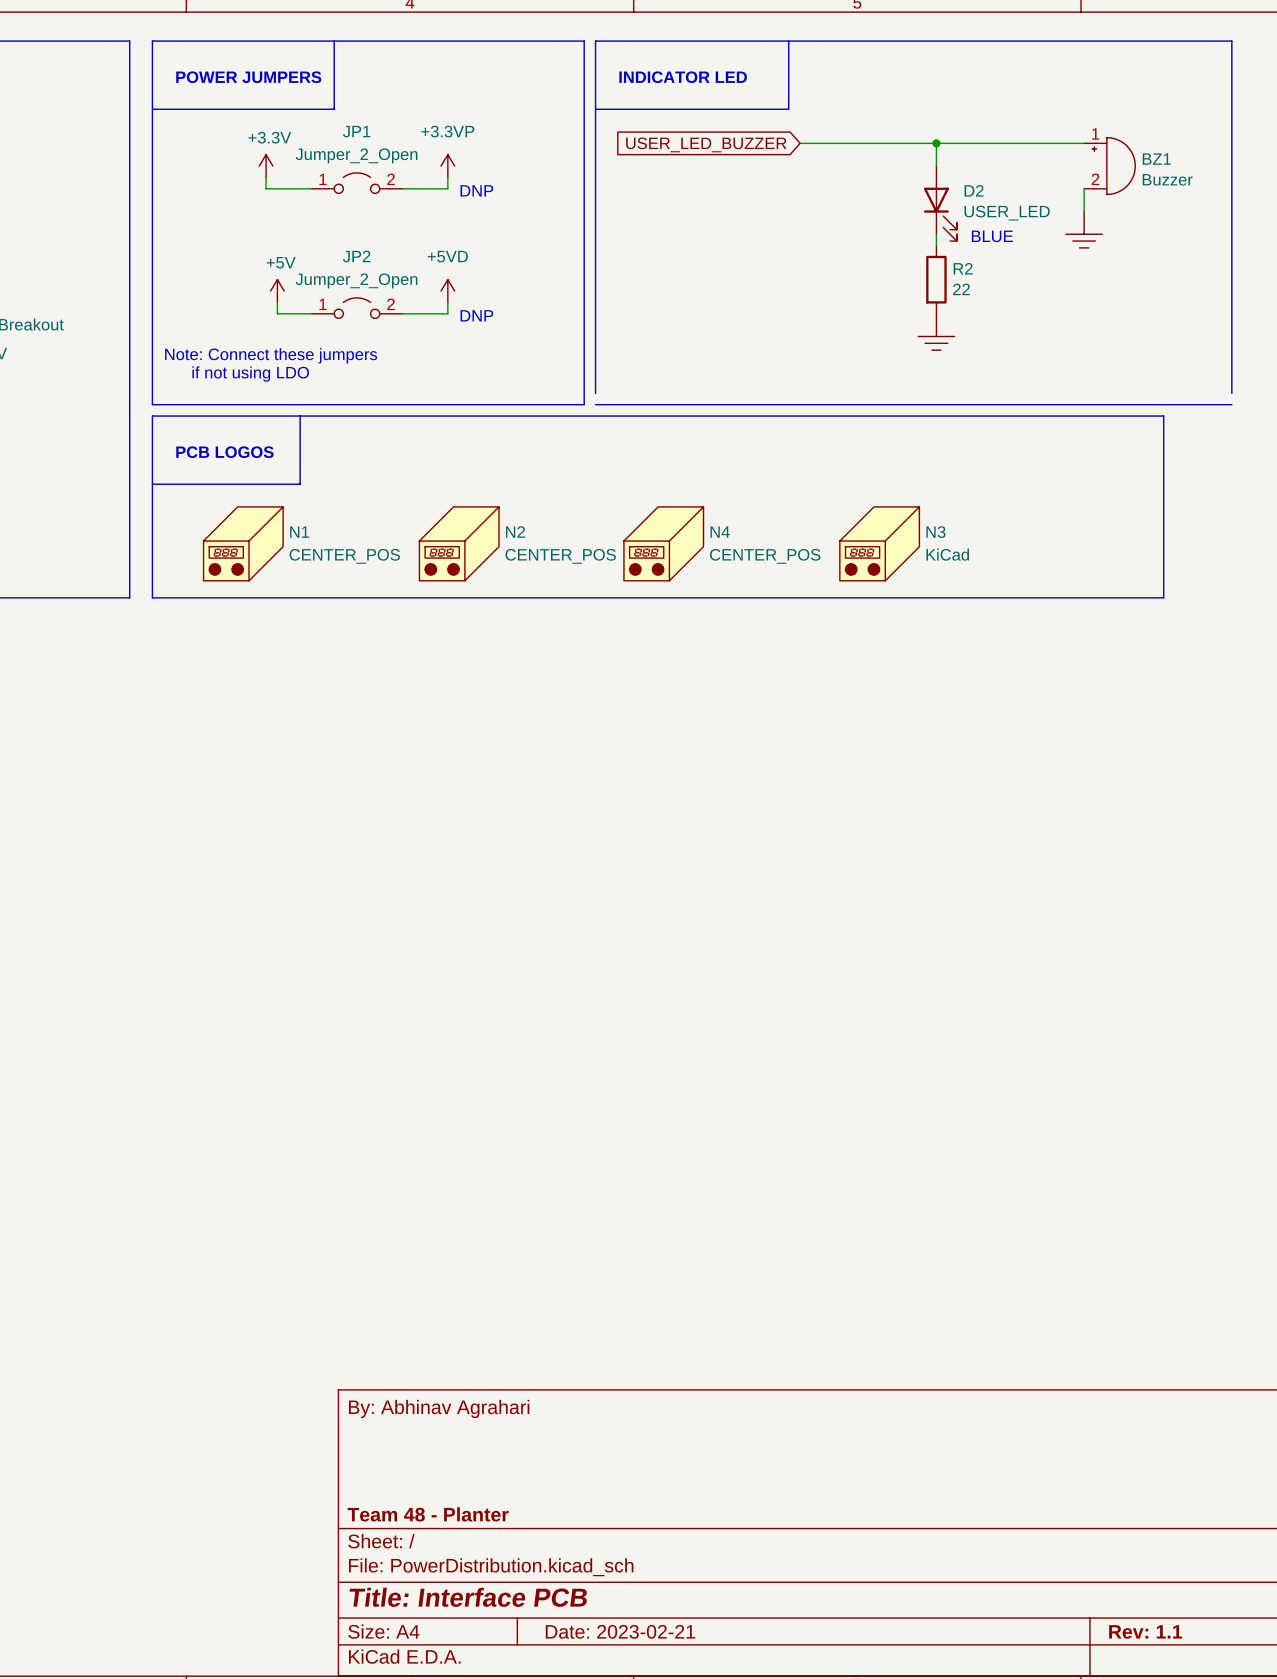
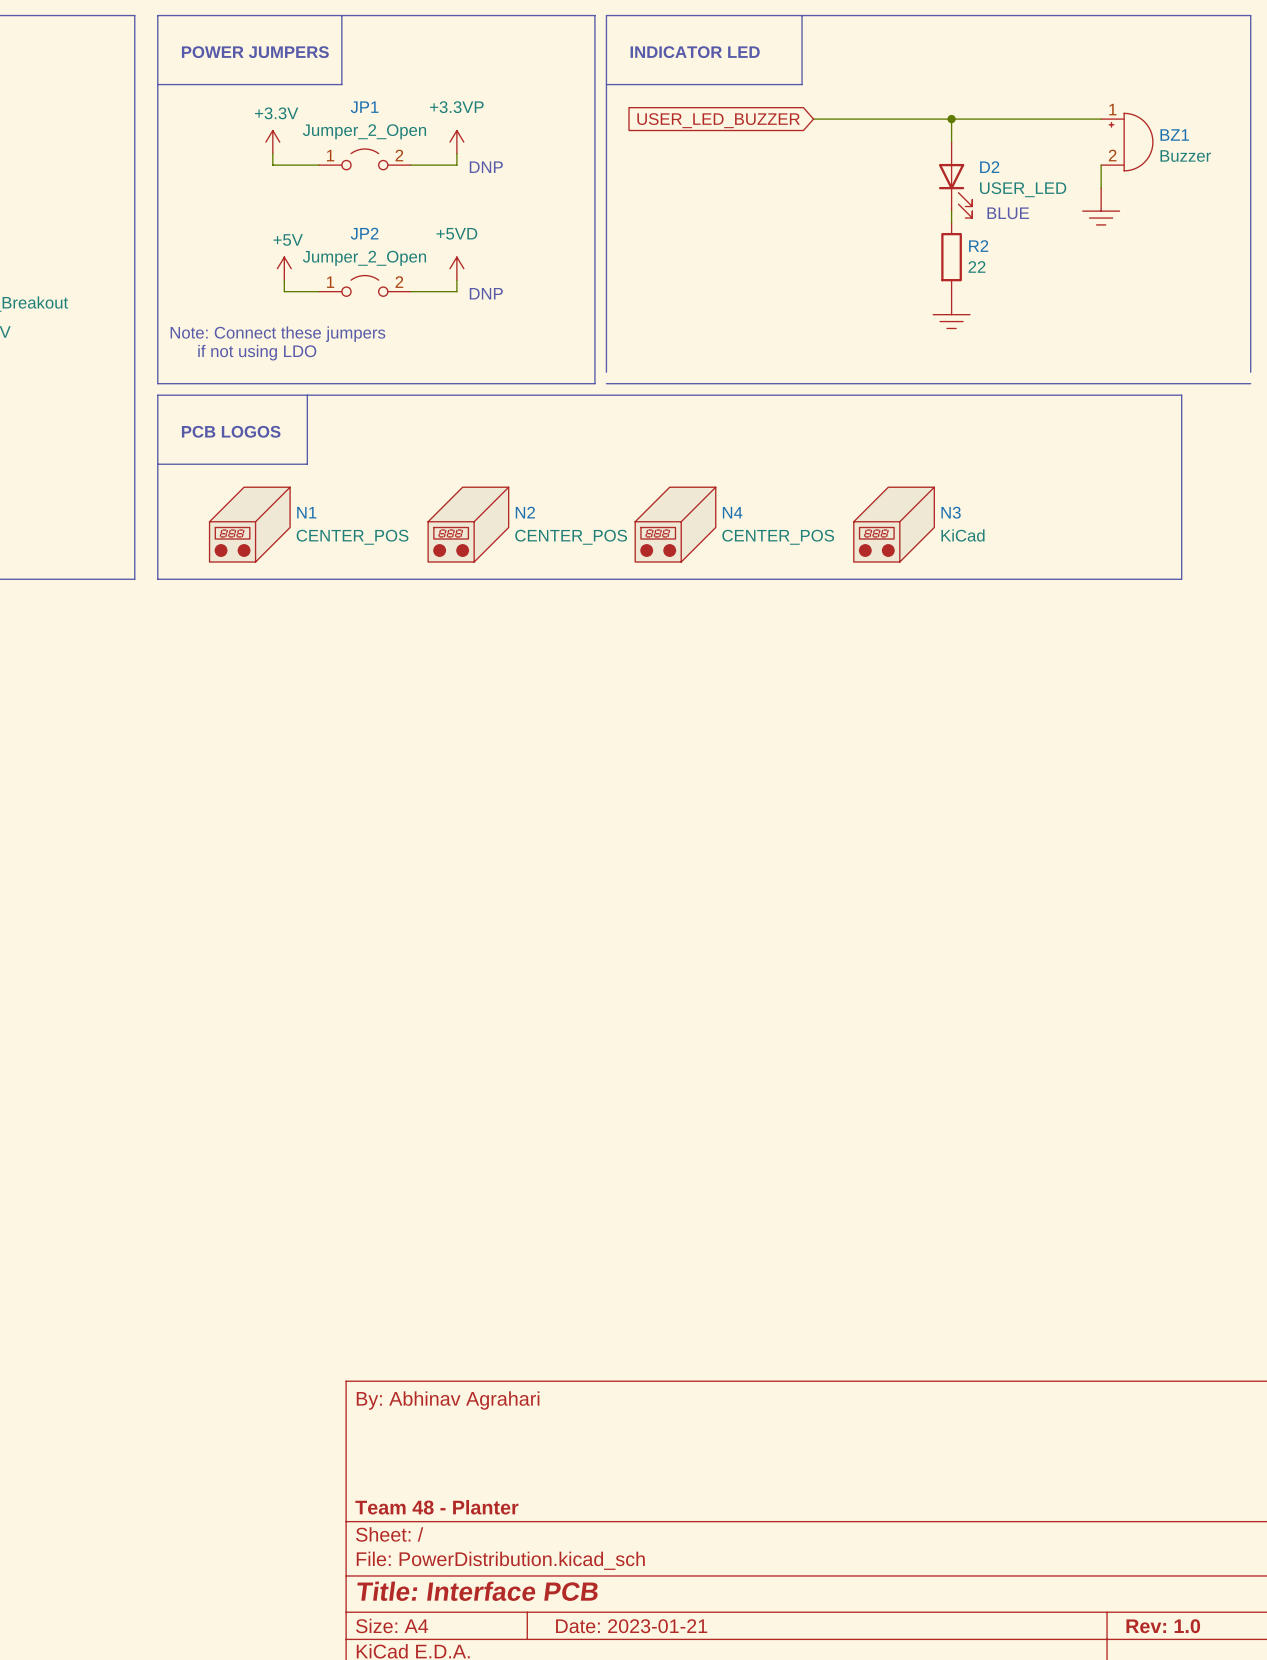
title block: Date: 2023-02-21 (620, 1631) -> Date: 2023-01-21 (631, 1626)
title block: Rev: 1.1 (1145, 1631) -> Rev: 1.0 (1163, 1626)

